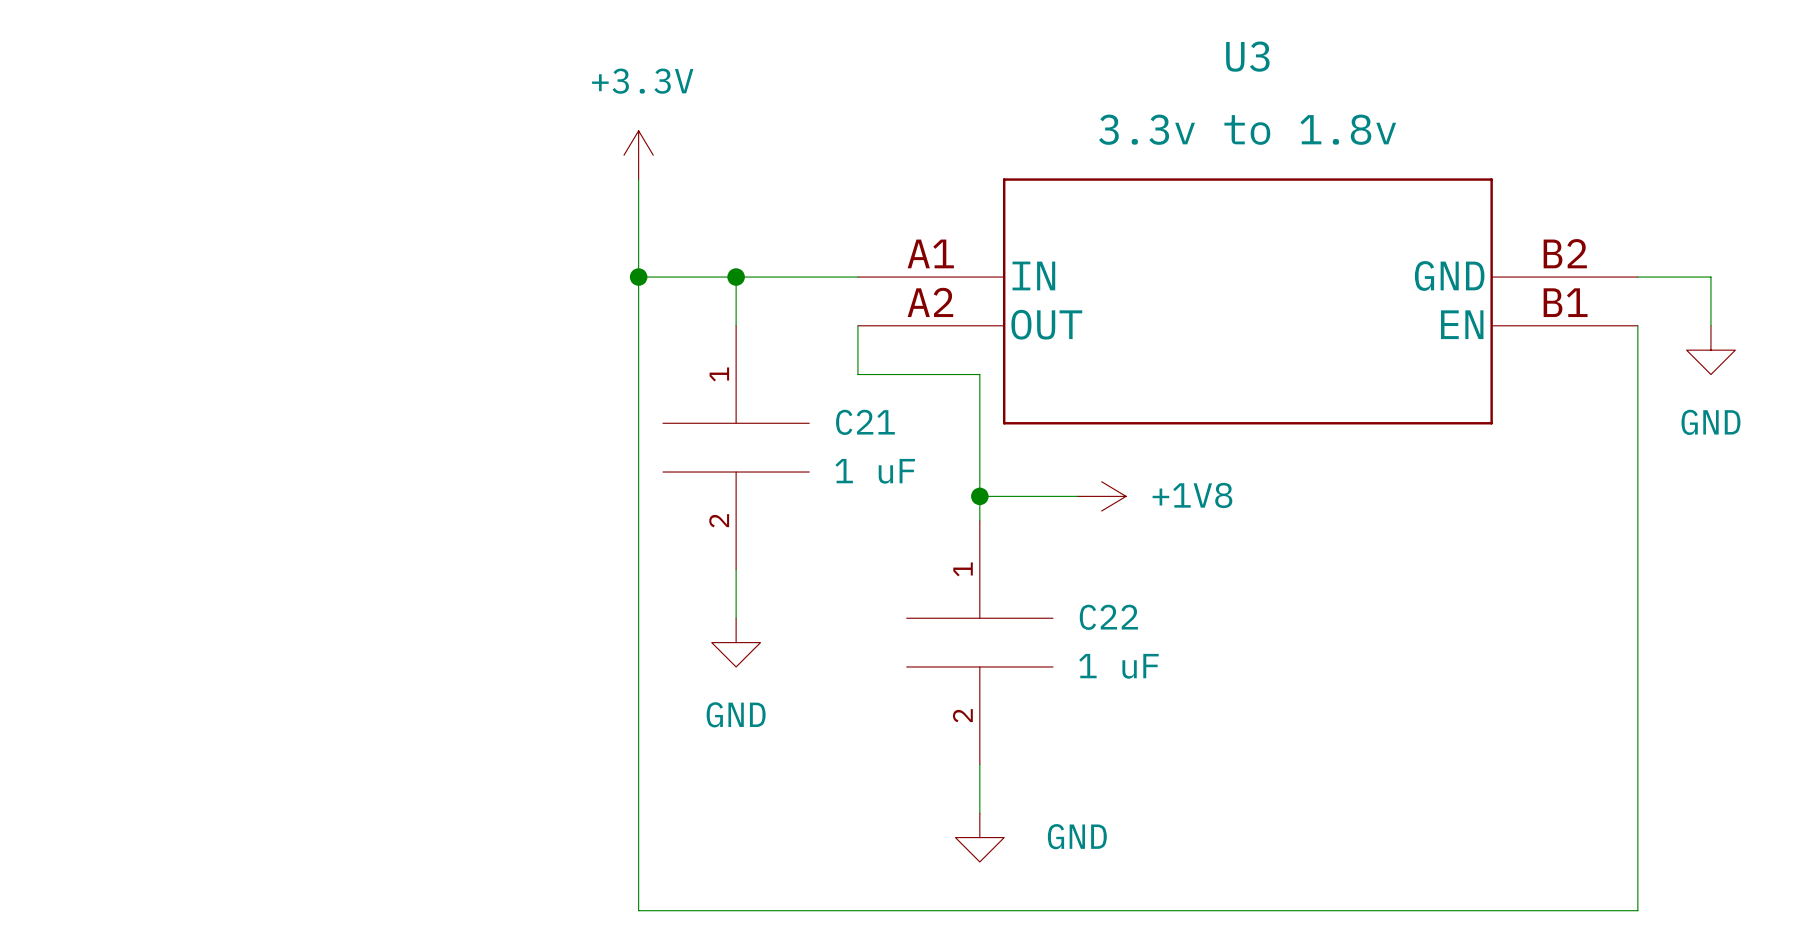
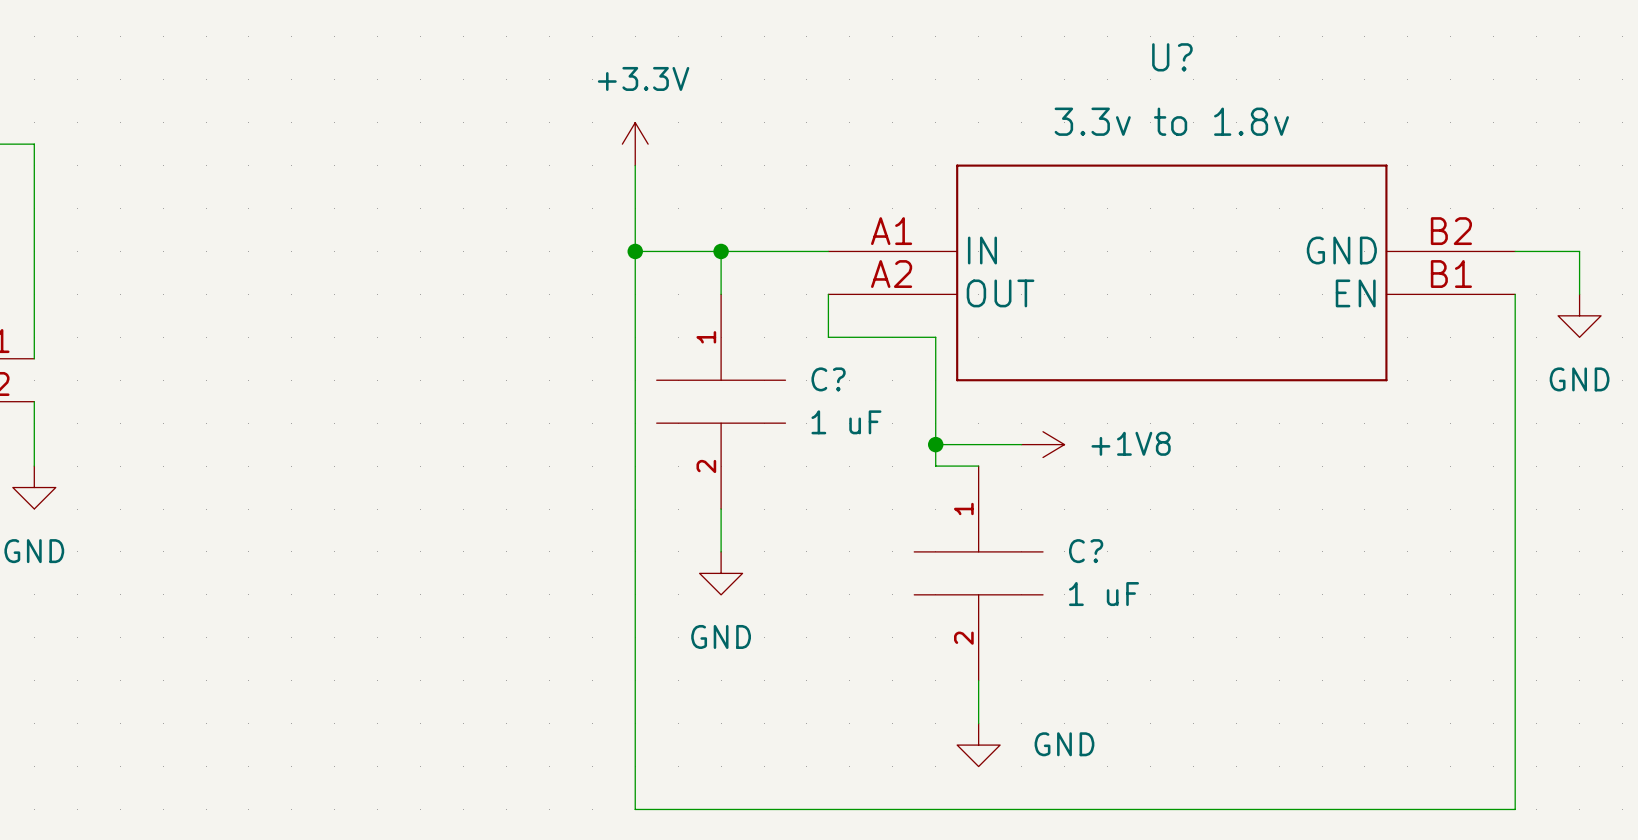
U3 name: U3 (1247, 56) -> U? (1172, 57)
C21 name: C21 (865, 422) -> C? (828, 379)
wire: none -> (935, 466) (978, 466)
C22: 1 uF (979, 642) -> none
C?: none -> 1 uF (978, 573)
wire: (979, 764) (979, 813) -> (978, 680) (978, 723)
power symbol position: GND (979, 837) -> GND (978, 745)

